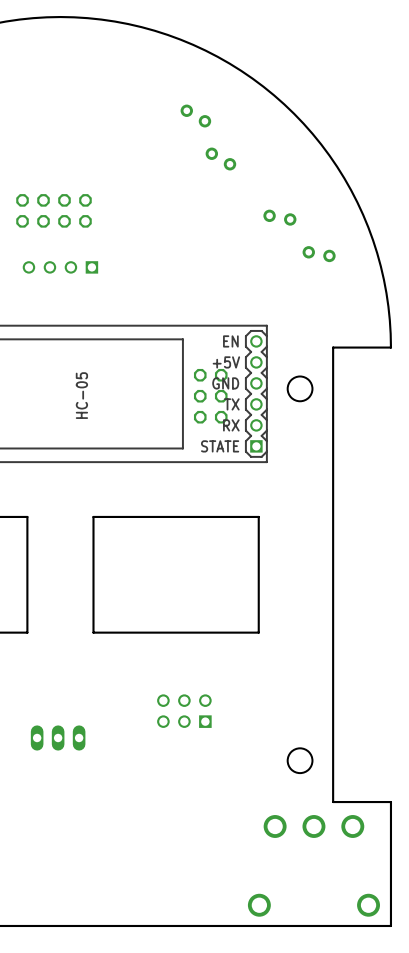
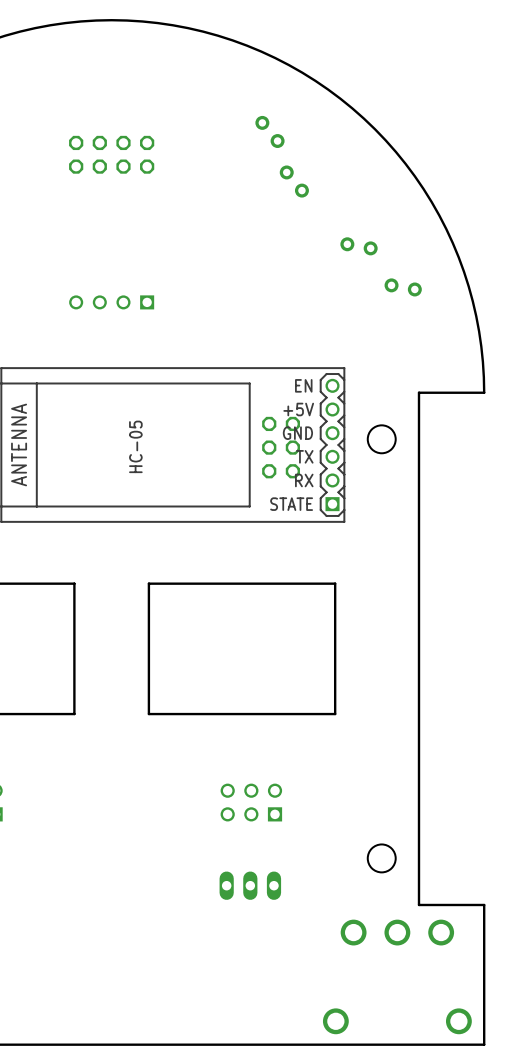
part rotation: 0° (195, 116) -> 20° clockwise (269, 131)
part rotation: 0° (220, 159) -> 20° clockwise (294, 181)
part position: (53, 210) -> (111, 154)
part position: (58, 737) -> (250, 885)

